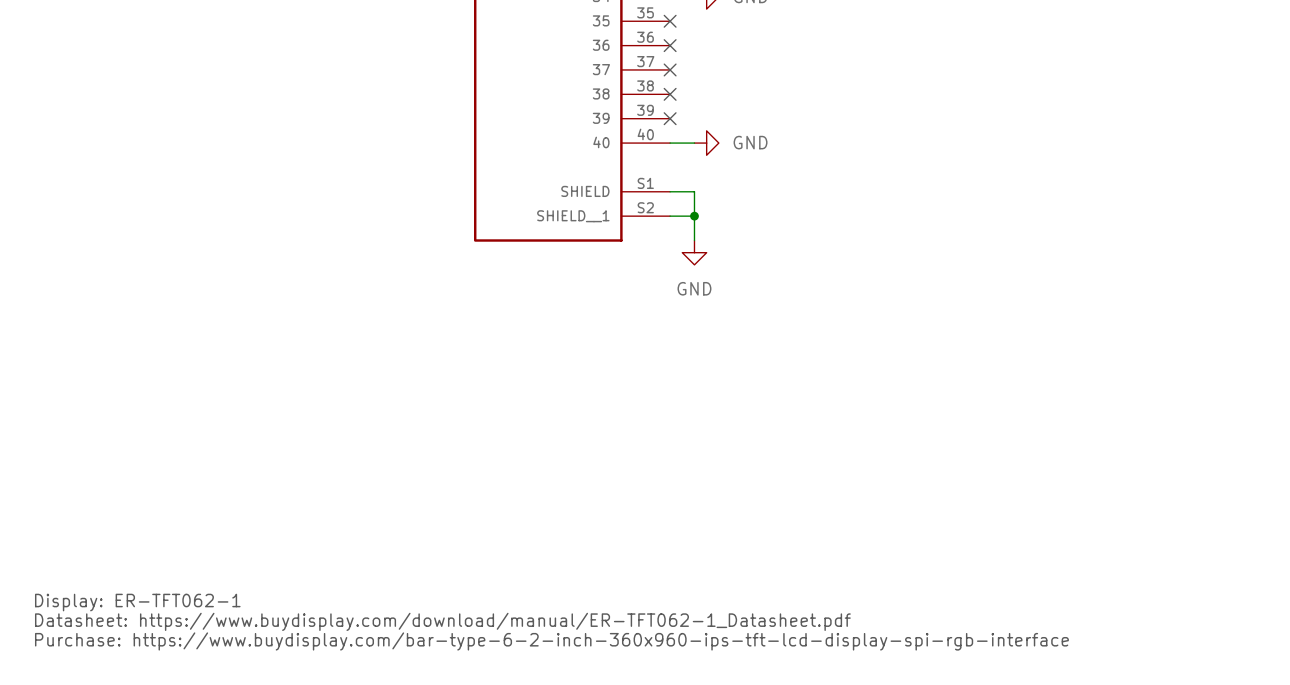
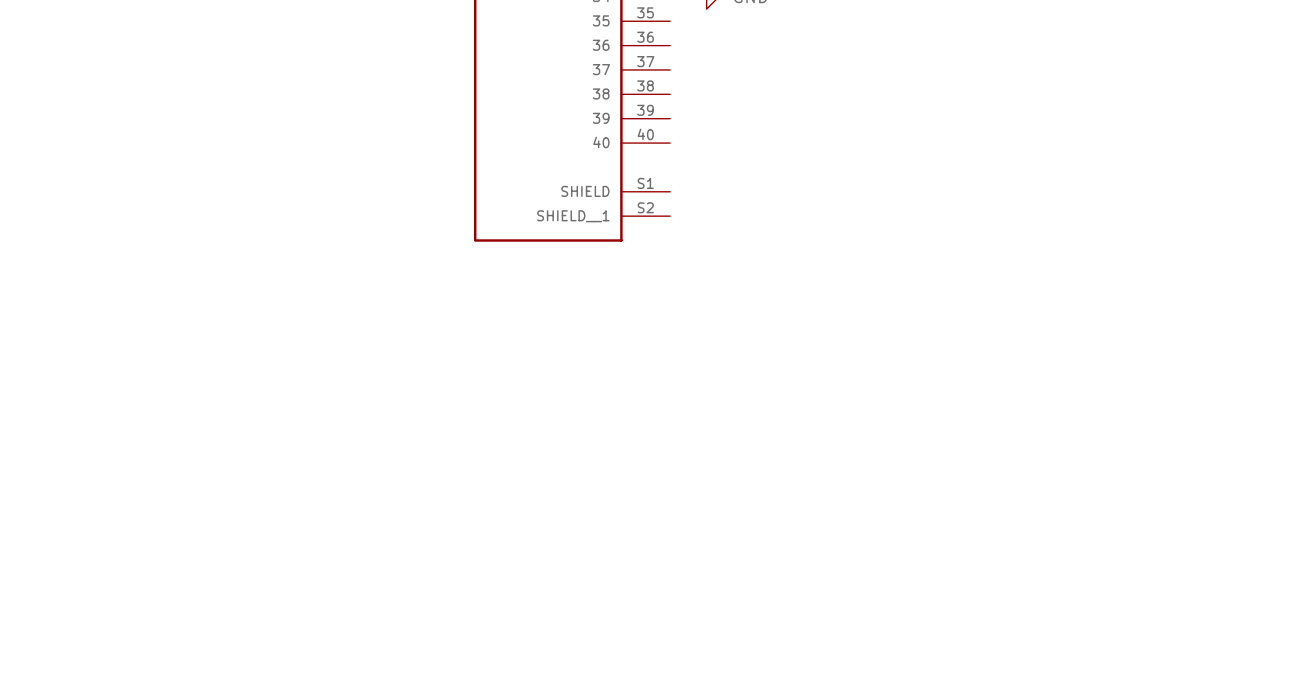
no-connect mark: (670, 21) -> none
no-connect mark: (670, 45) -> none
no-connect mark: (670, 69) -> none
no-connect mark: (670, 94) -> none
no-connect mark: (670, 118) -> none
wire: (670, 143) (694, 143) -> none
power symbol: GND (706, 143) -> none
wire: (670, 191) (694, 191) (694, 240) -> none
wire: (670, 216) (694, 216) -> none
junction: (694, 216) -> none
power symbol: GND (694, 252) -> none
text: Display: ER-TFT062-1 (137, 602) -> none
text: Datasheet: https://www.buydisplay.com/download/manual/ER-TFT062-1_Datasheet.pdf (442, 621) -> none
text: Purchase: https://www.buydisplay.com/bar-type-6-2-inch-360x960-ips-tft-lcd-display-spi-rgb-interface (551, 641) -> none

